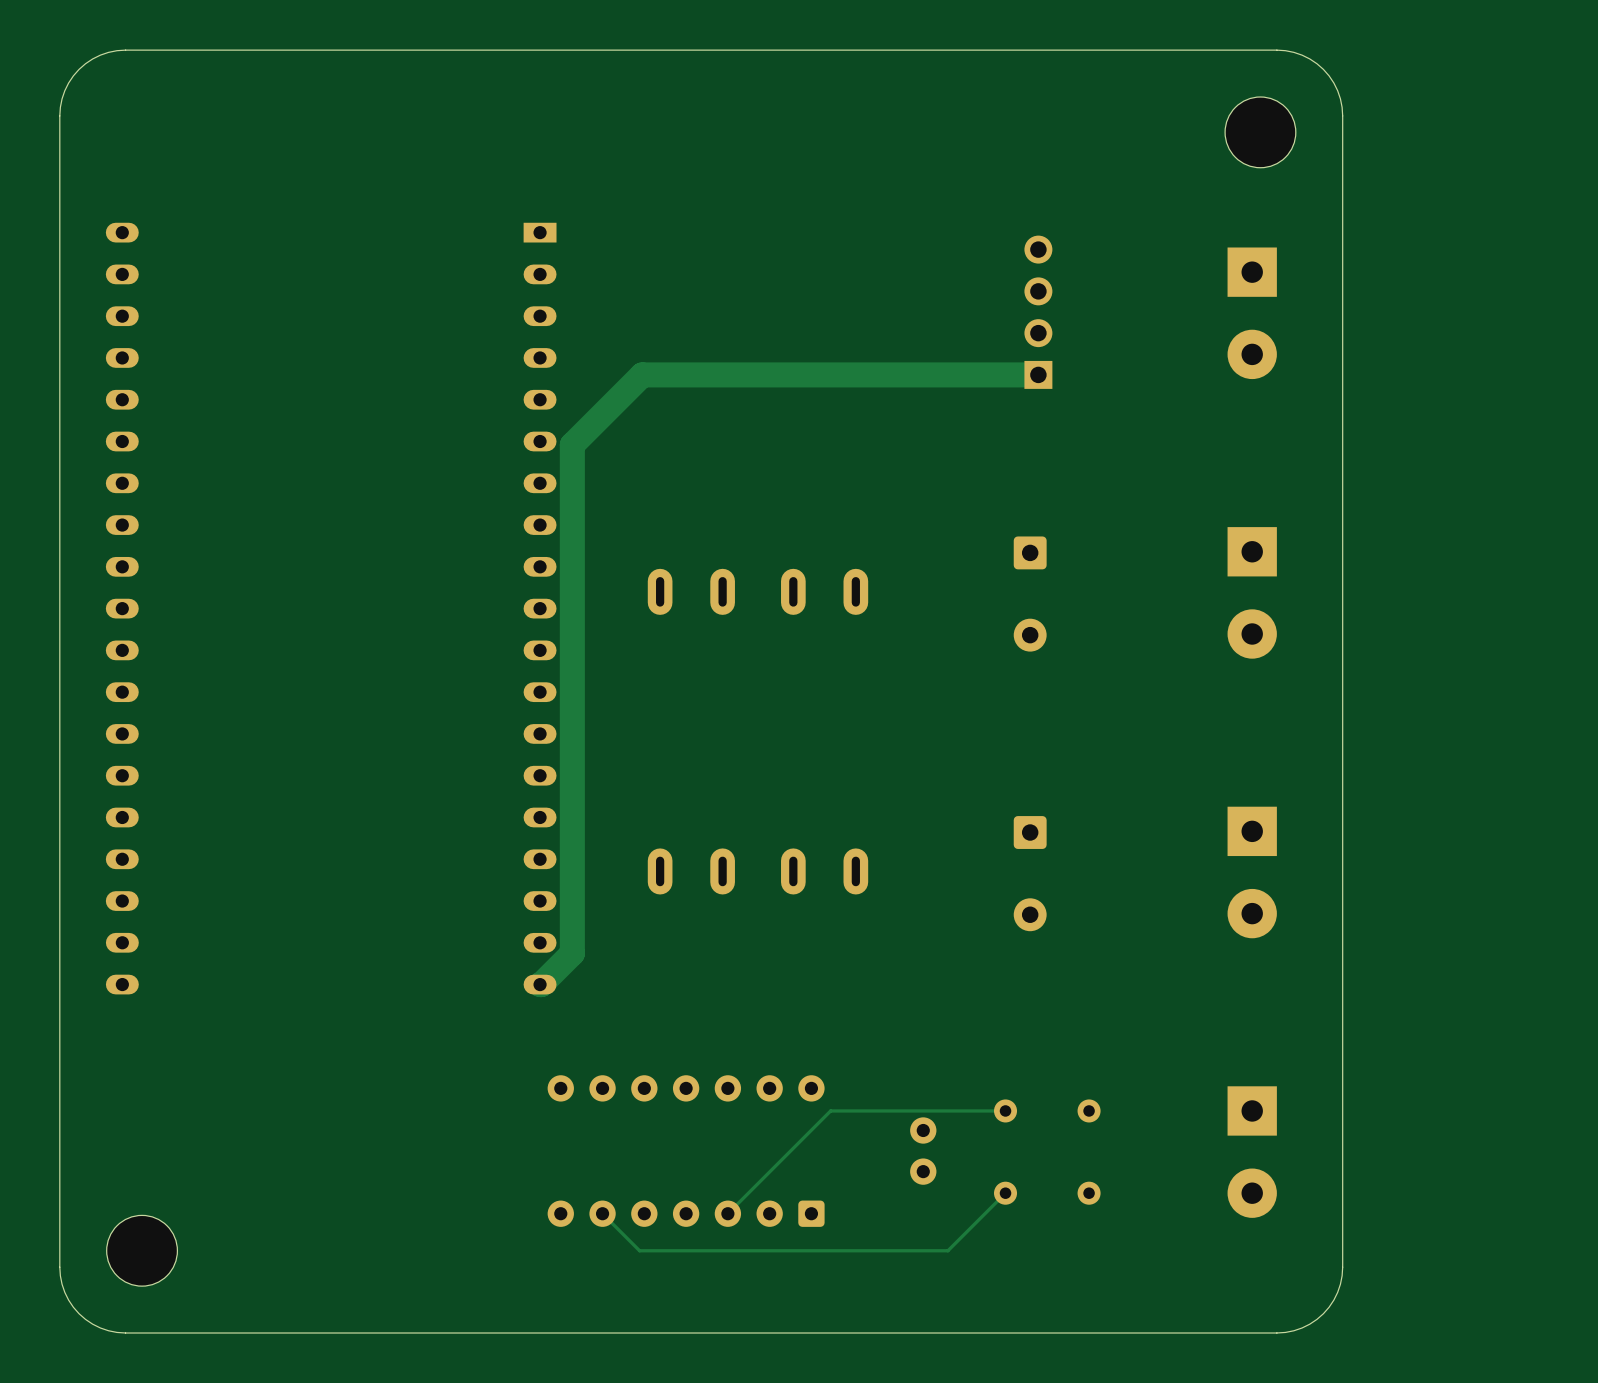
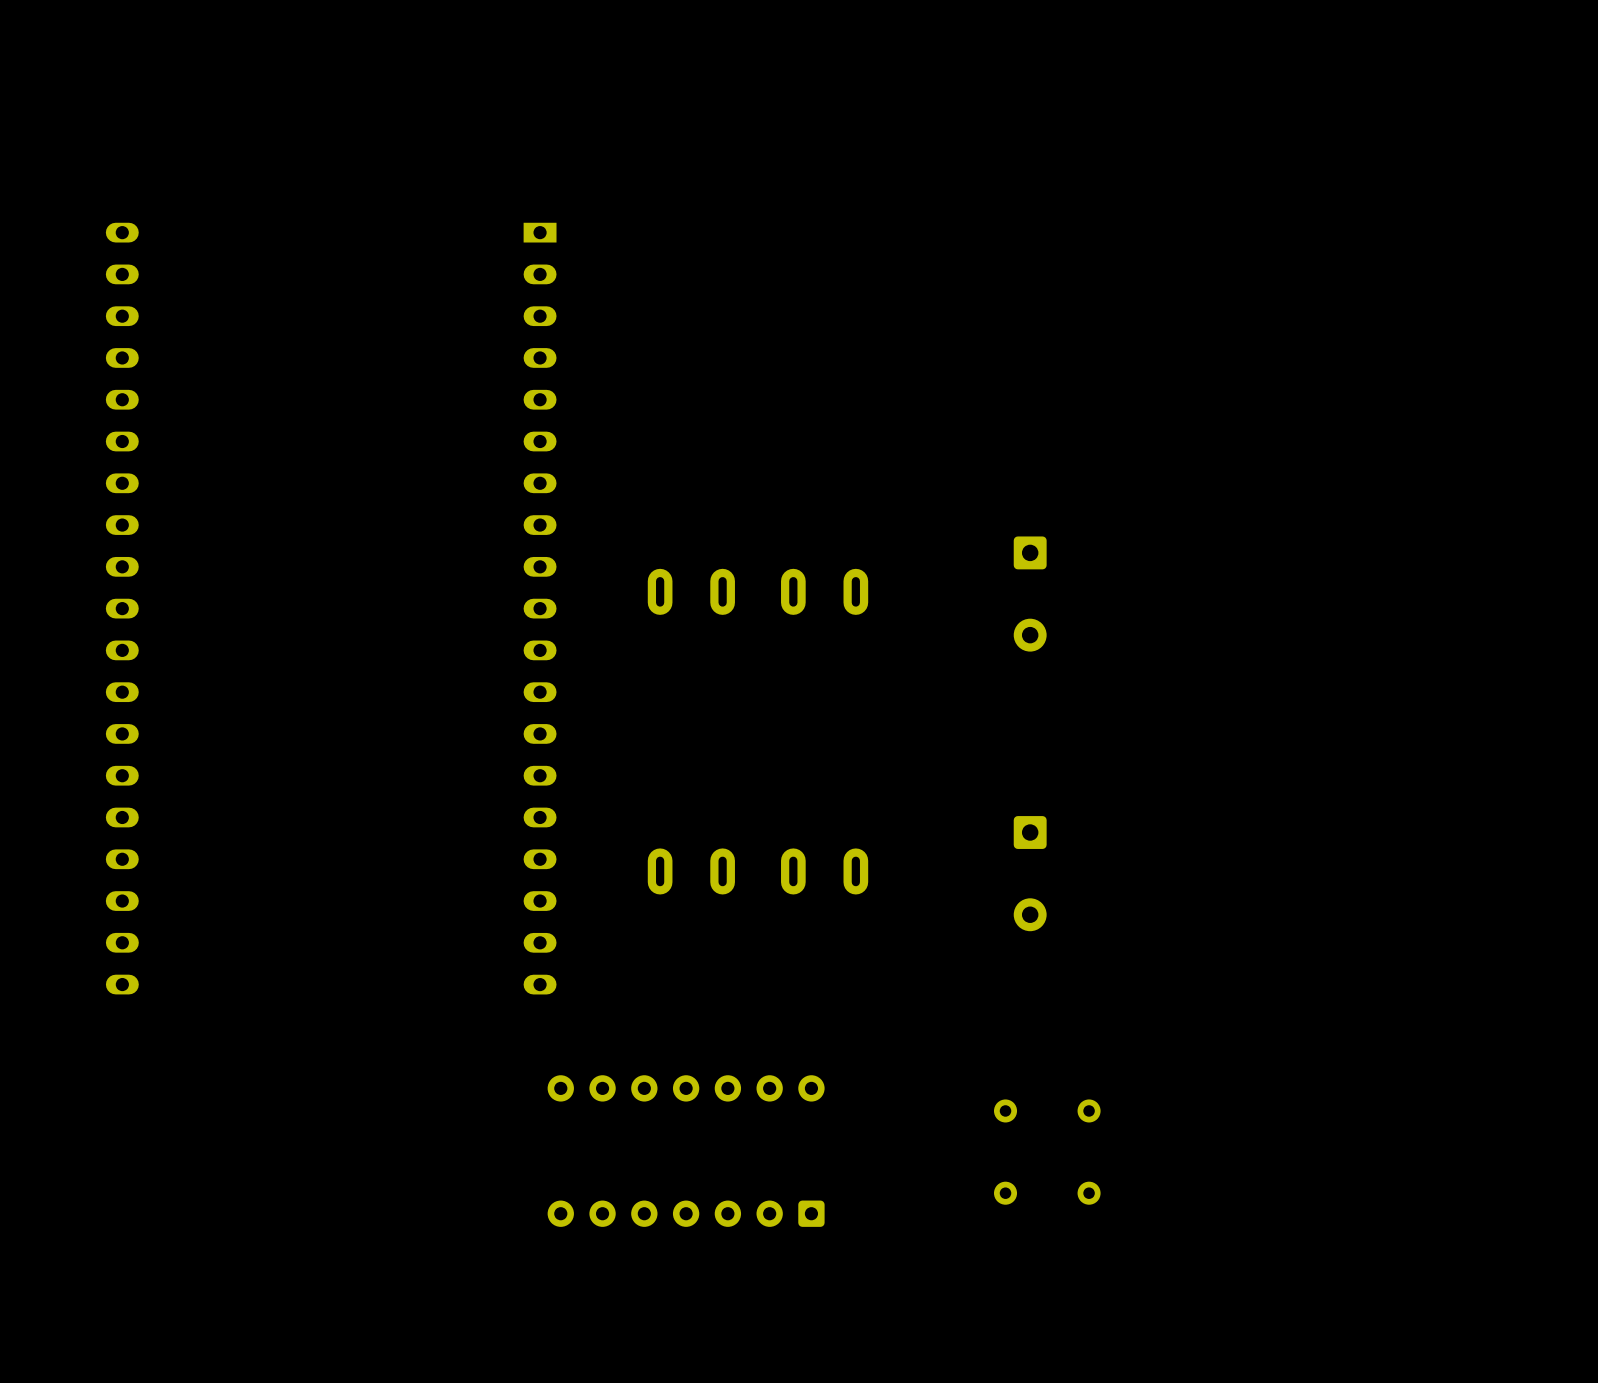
board edge: (1276, 50) (125, 50) (100, 55) (79, 69) (64, 90) (59, 115) (59, 1267) (64, 1292) (79, 1313) (100, 1327) (125, 1333) (1276, 1333) (1302, 1327) (1323, 1313) (1337, 1292) (1342, 1267) (1342, 115) (1337, 90) (1323, 69) (1302, 55) (1276, 50) -> none
part: (1260, 132) -> none
part: (1038, 312) -> none
part: (1252, 313) -> none
track: (1038, 374) (642, 374) (572, 444) (572, 953) (540, 984) -> none
part: (1252, 592) -> none
part: (1252, 872) -> none
track: (1005, 1110) (830, 1110) (727, 1213) -> none
part: (923, 1151) -> none
part: (1252, 1152) -> none
track: (1005, 1193) (947, 1250) (639, 1250) (602, 1213) -> none
part: (142, 1250) -> none

